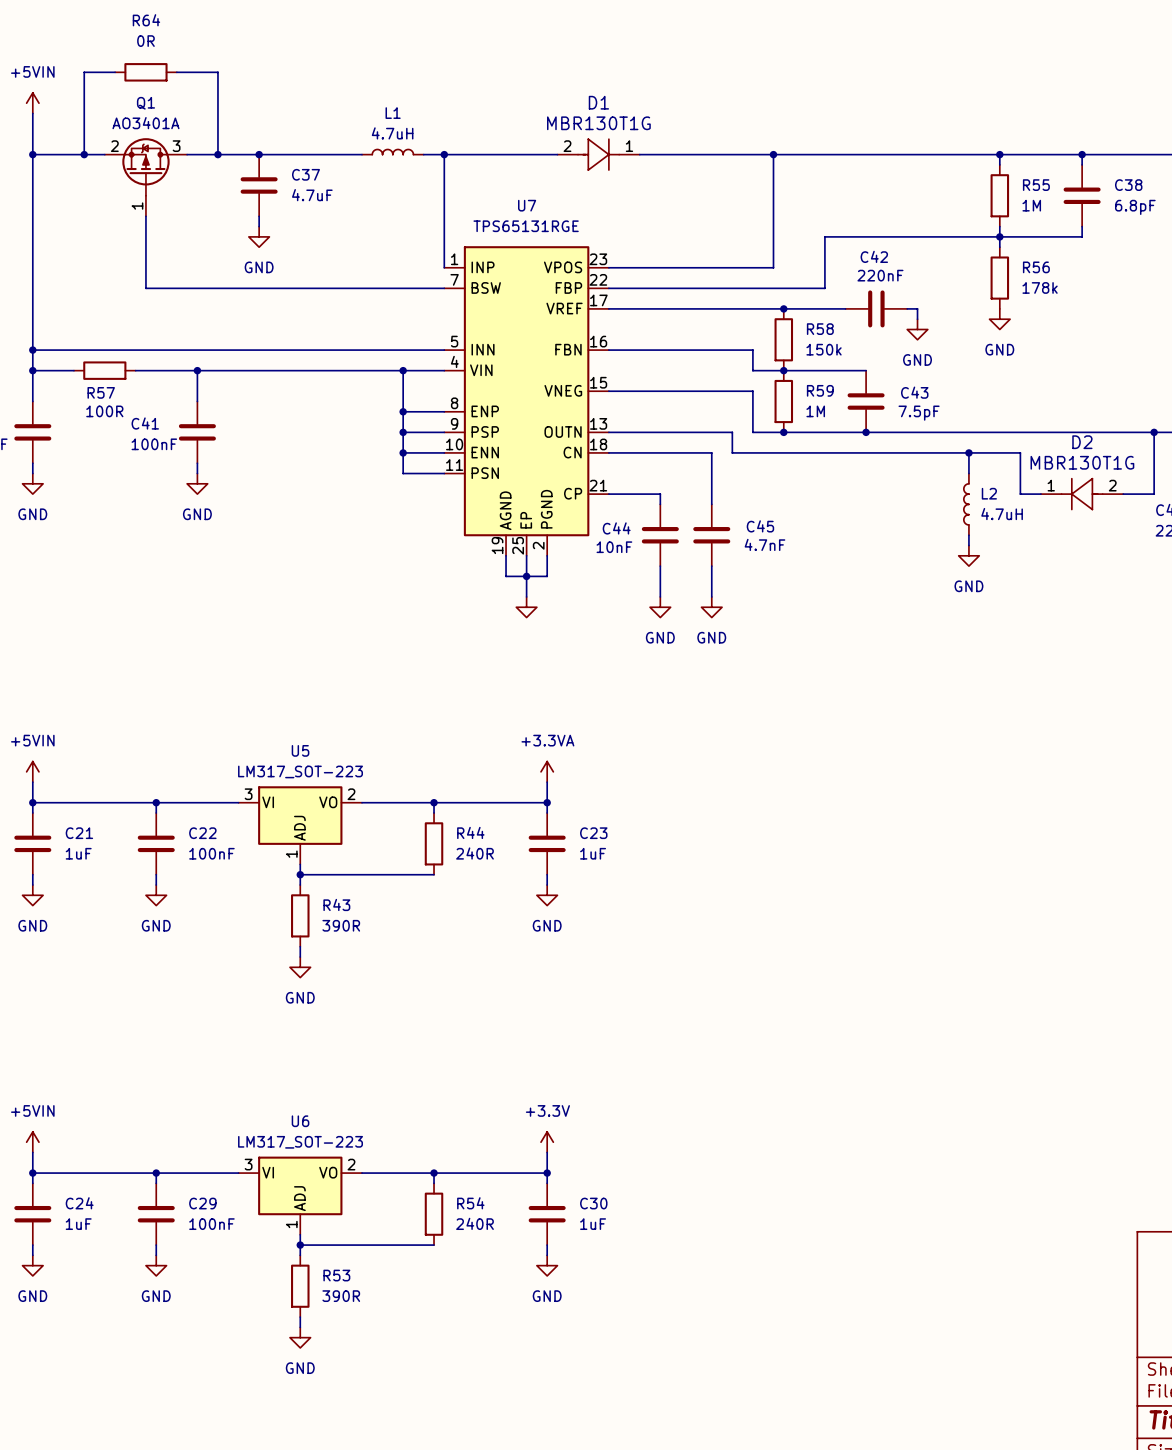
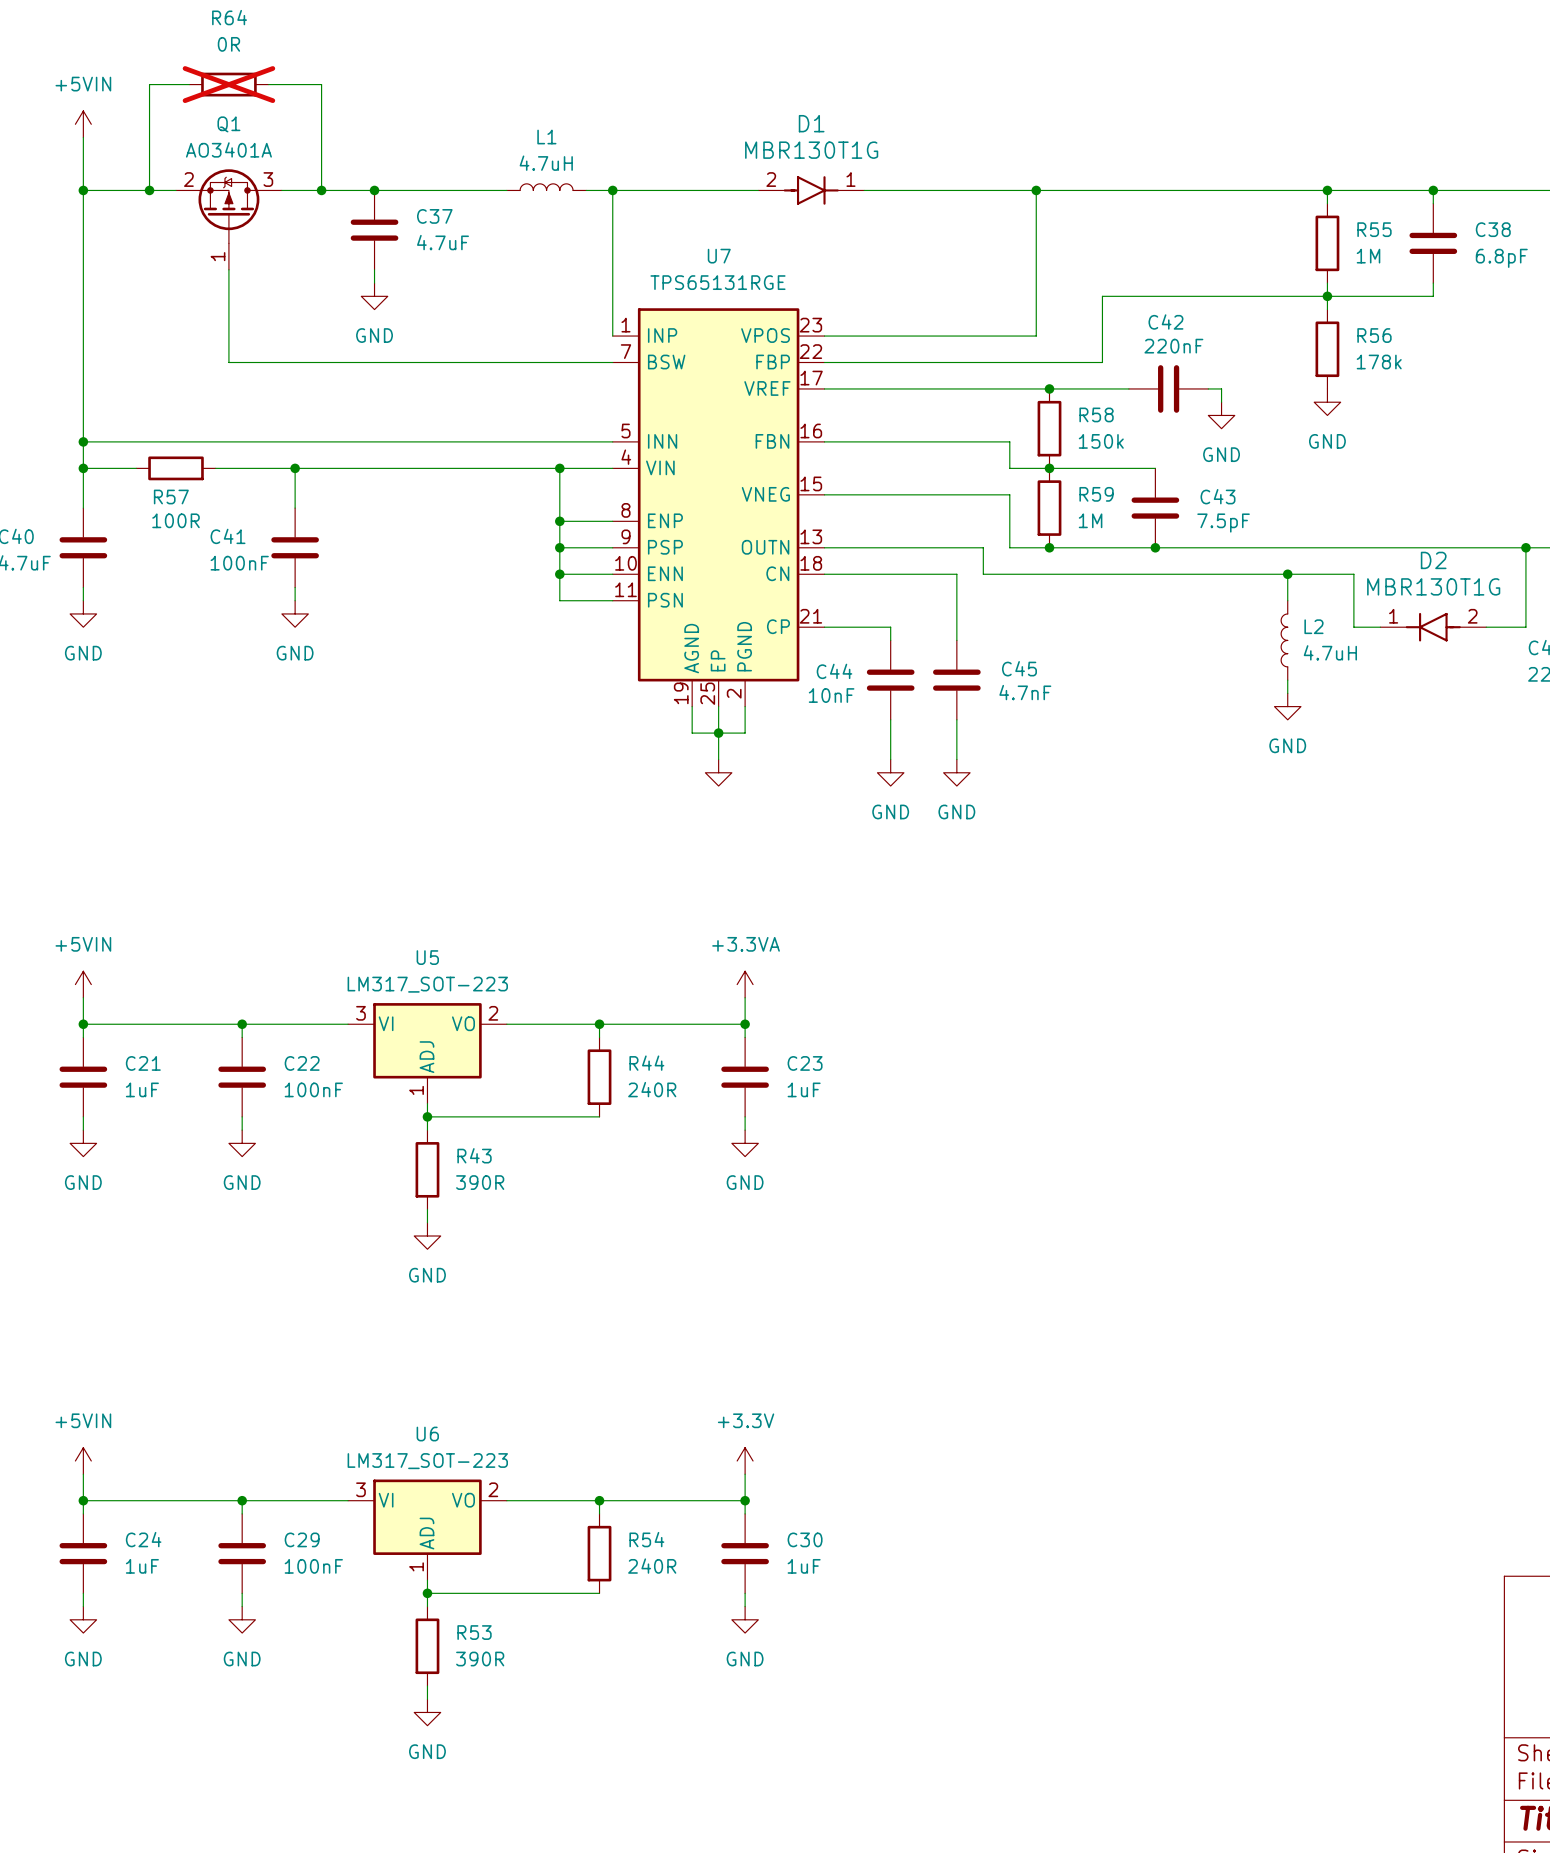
R64 do-not-place cross: none -> (228, 84)
D1 symbol: [557, 138, 640, 171] -> [758, 176, 865, 205]
D2 symbol: [1040, 477, 1124, 511] -> [1380, 612, 1487, 642]

